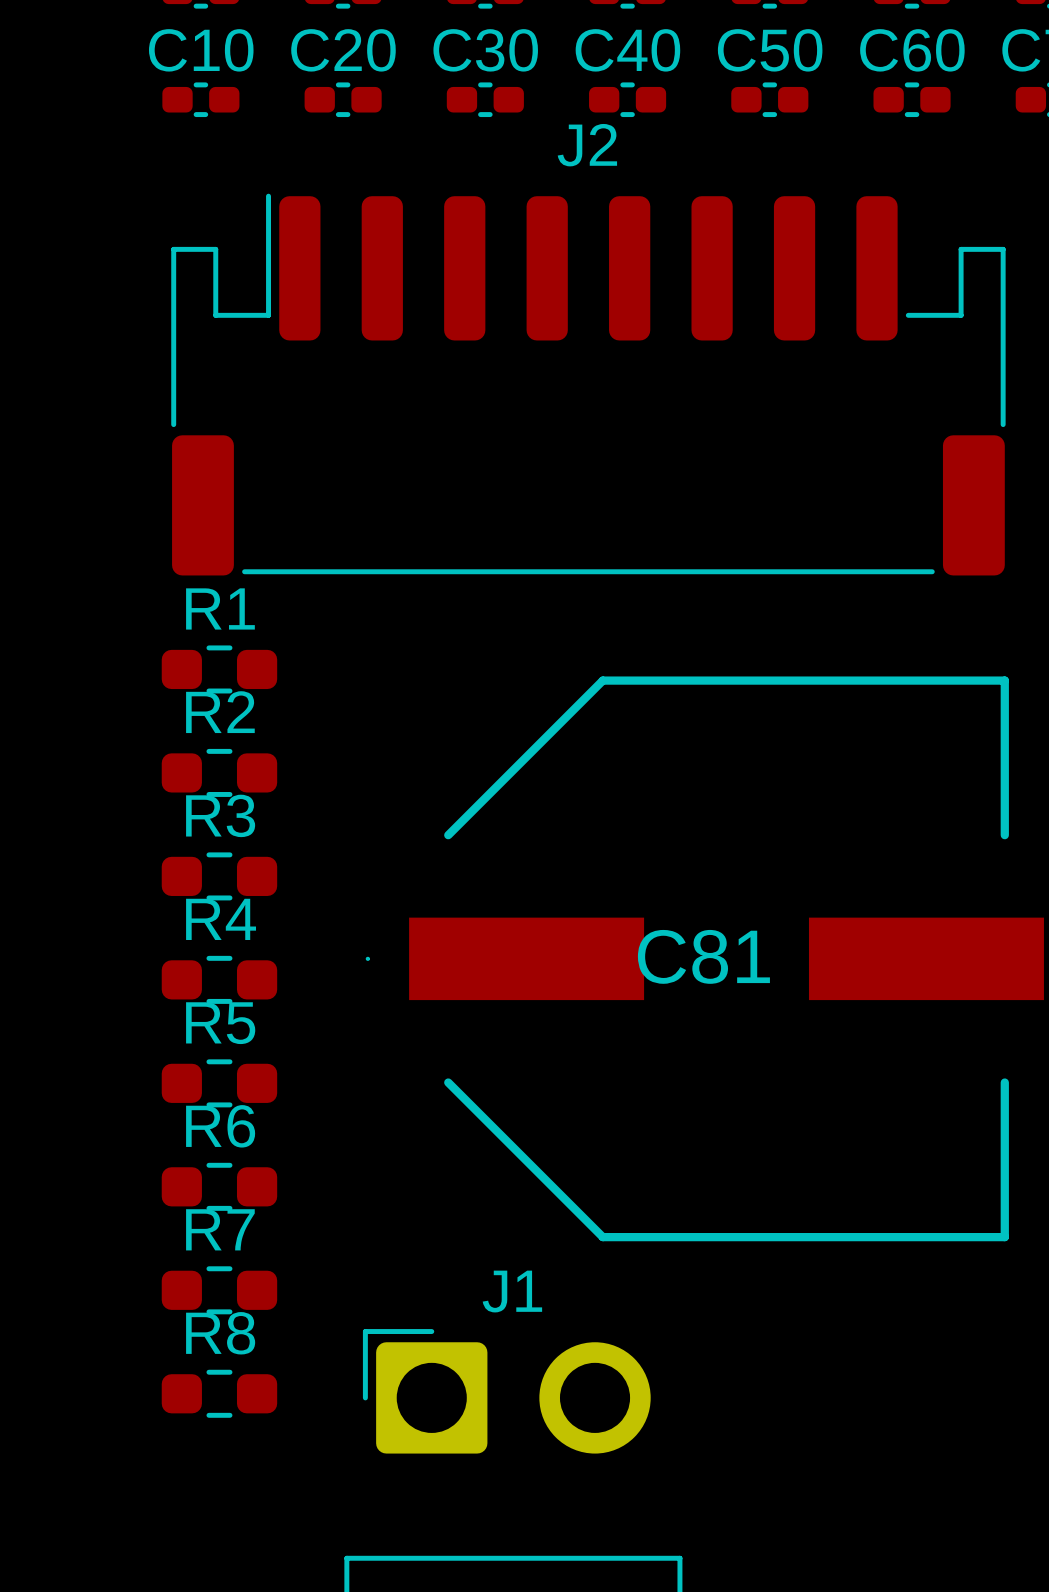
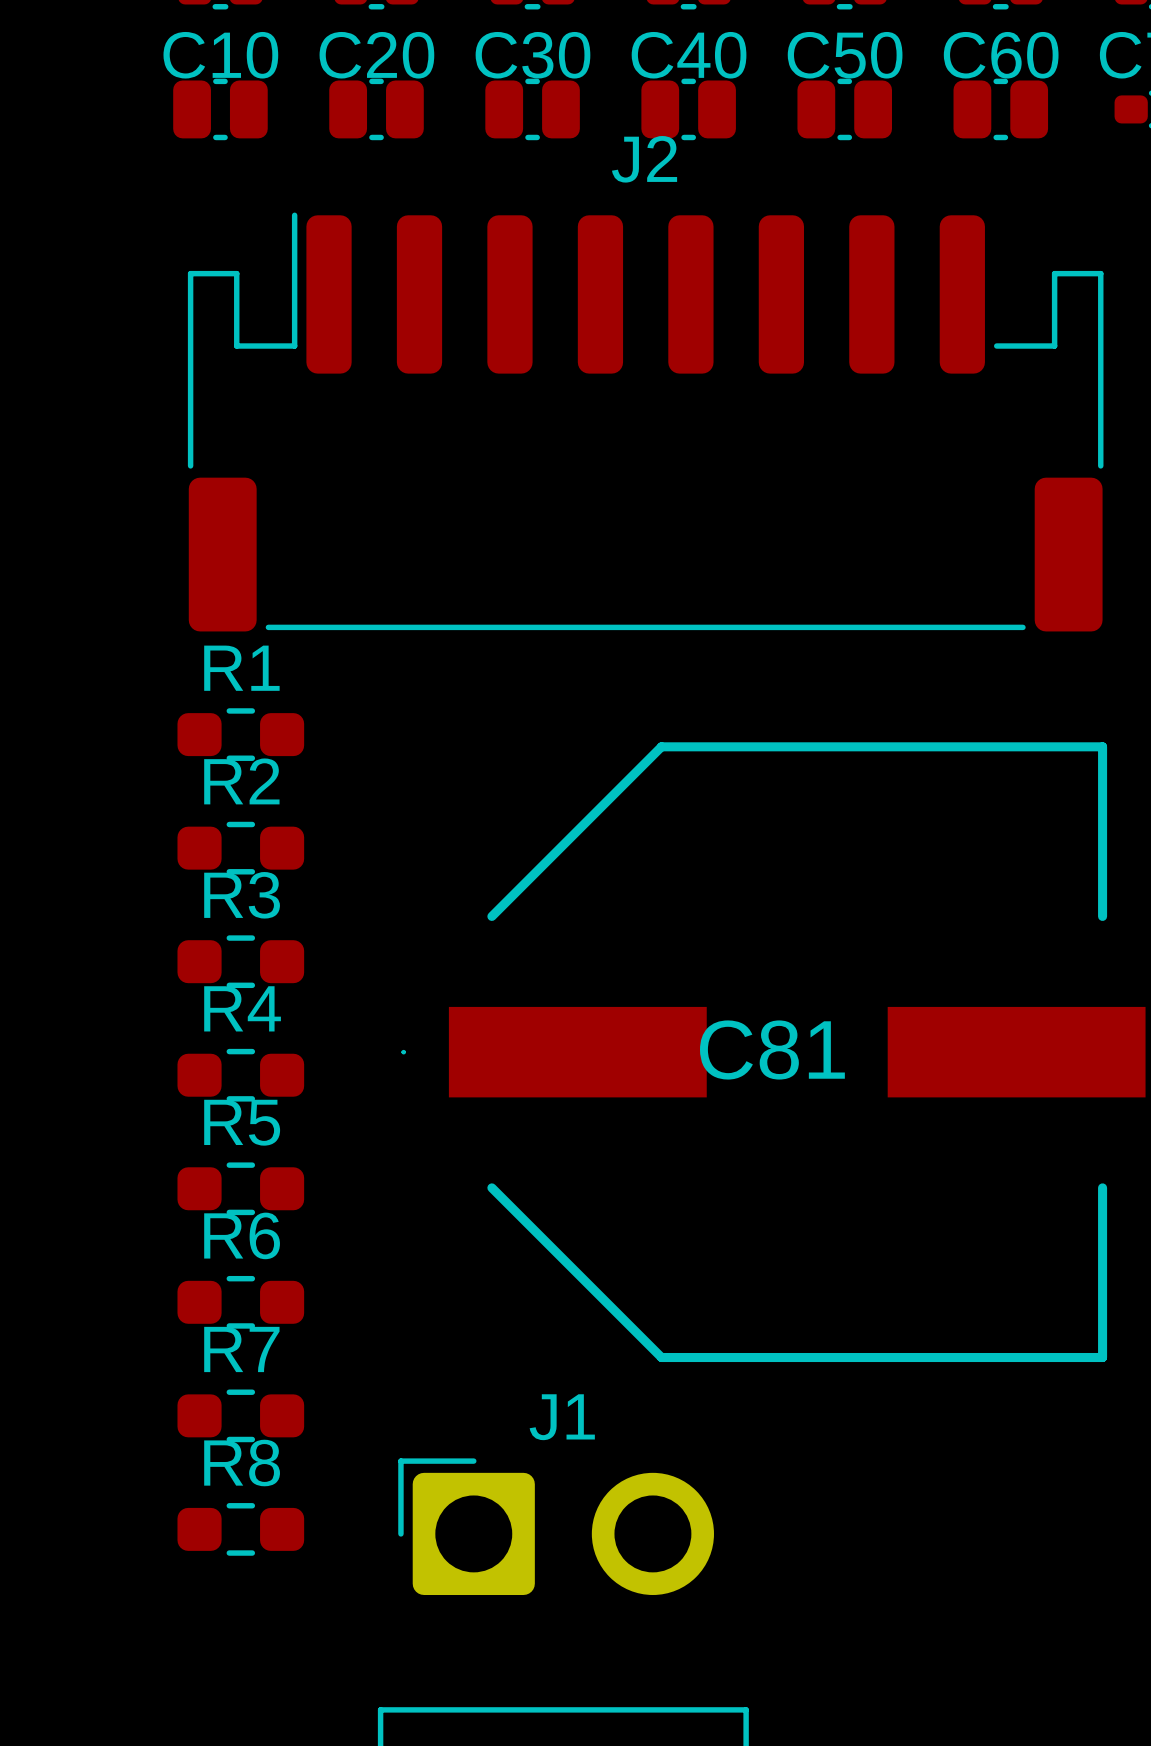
C10 footprint: [162, 82, 240, 118] -> [173, 78, 268, 141]
C20 footprint: [304, 82, 382, 118] -> [329, 78, 424, 141]
C30 footprint: [446, 82, 524, 118] -> [485, 78, 580, 141]
C40 footprint: [589, 82, 667, 118] -> [641, 78, 736, 141]
C50 footprint: [731, 82, 809, 118] -> [797, 78, 892, 141]
C60 footprint: [873, 82, 951, 118] -> [953, 78, 1049, 141]

